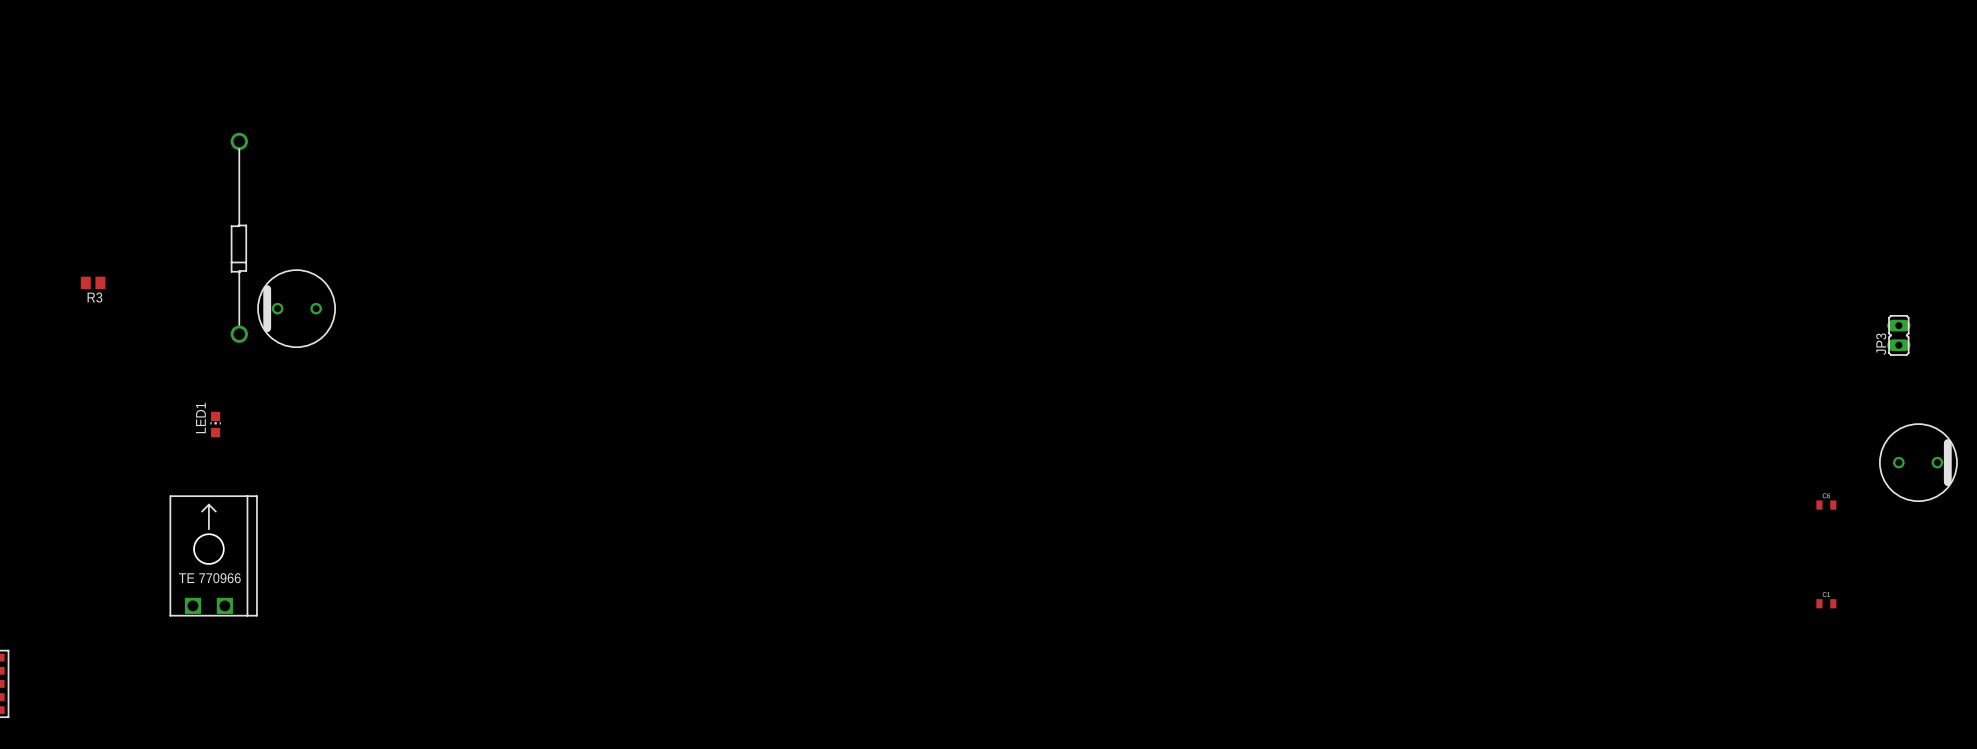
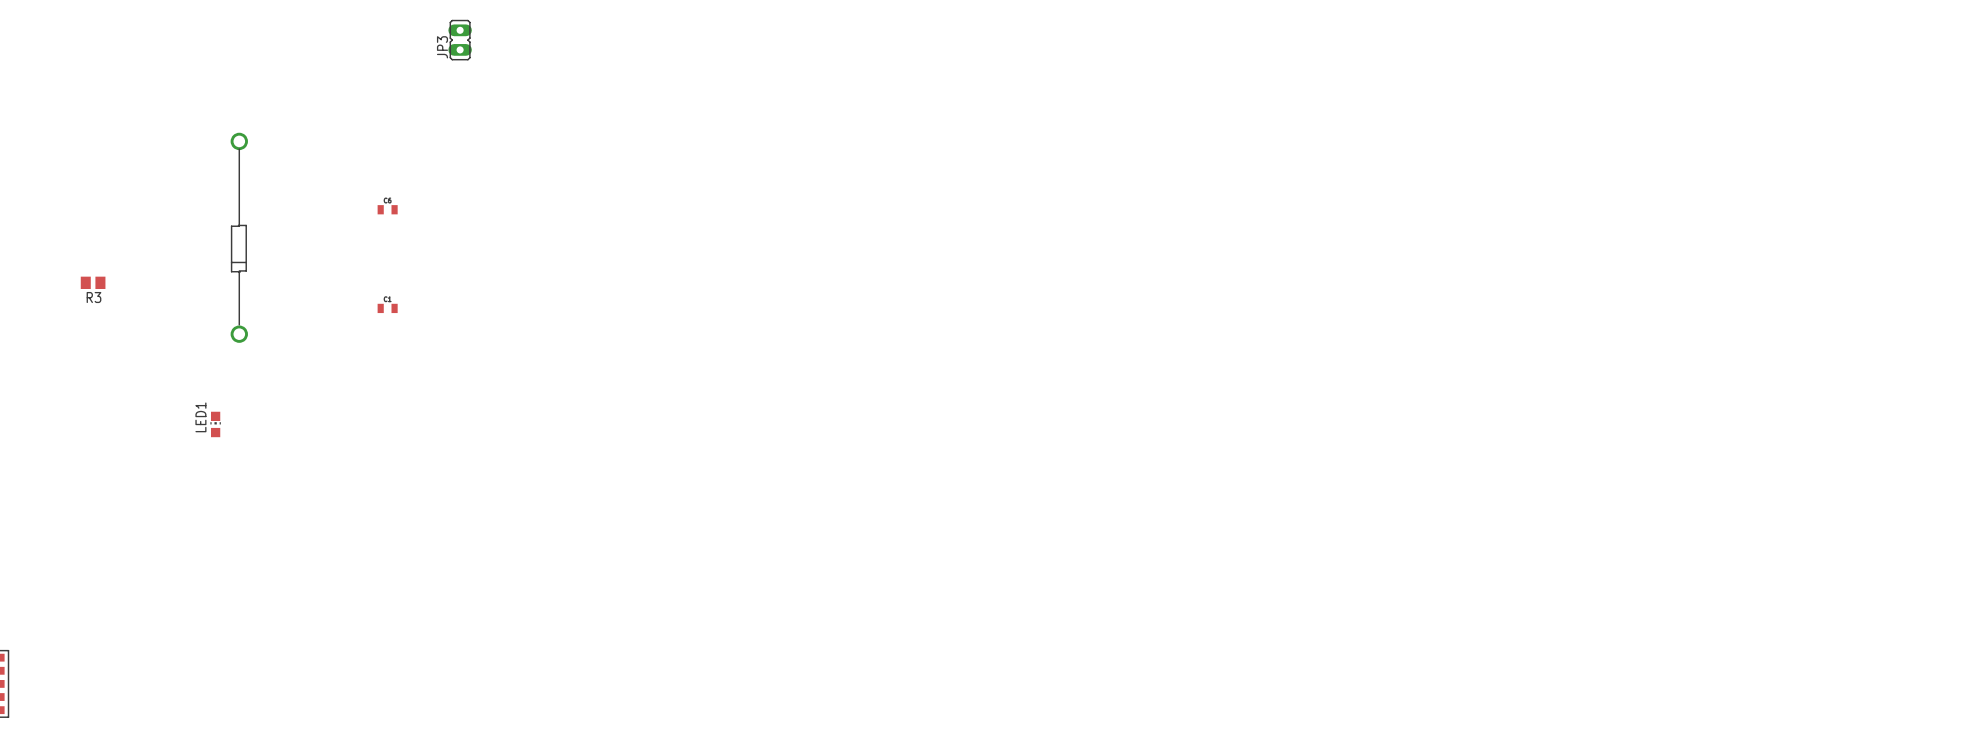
part: (296, 308) -> none
JP3 position: (1898, 335) -> (460, 40)
part: (1918, 462) -> none
part position: (1826, 505) -> (387, 209)
part: (213, 555) -> none
part position: (1826, 603) -> (387, 308)

